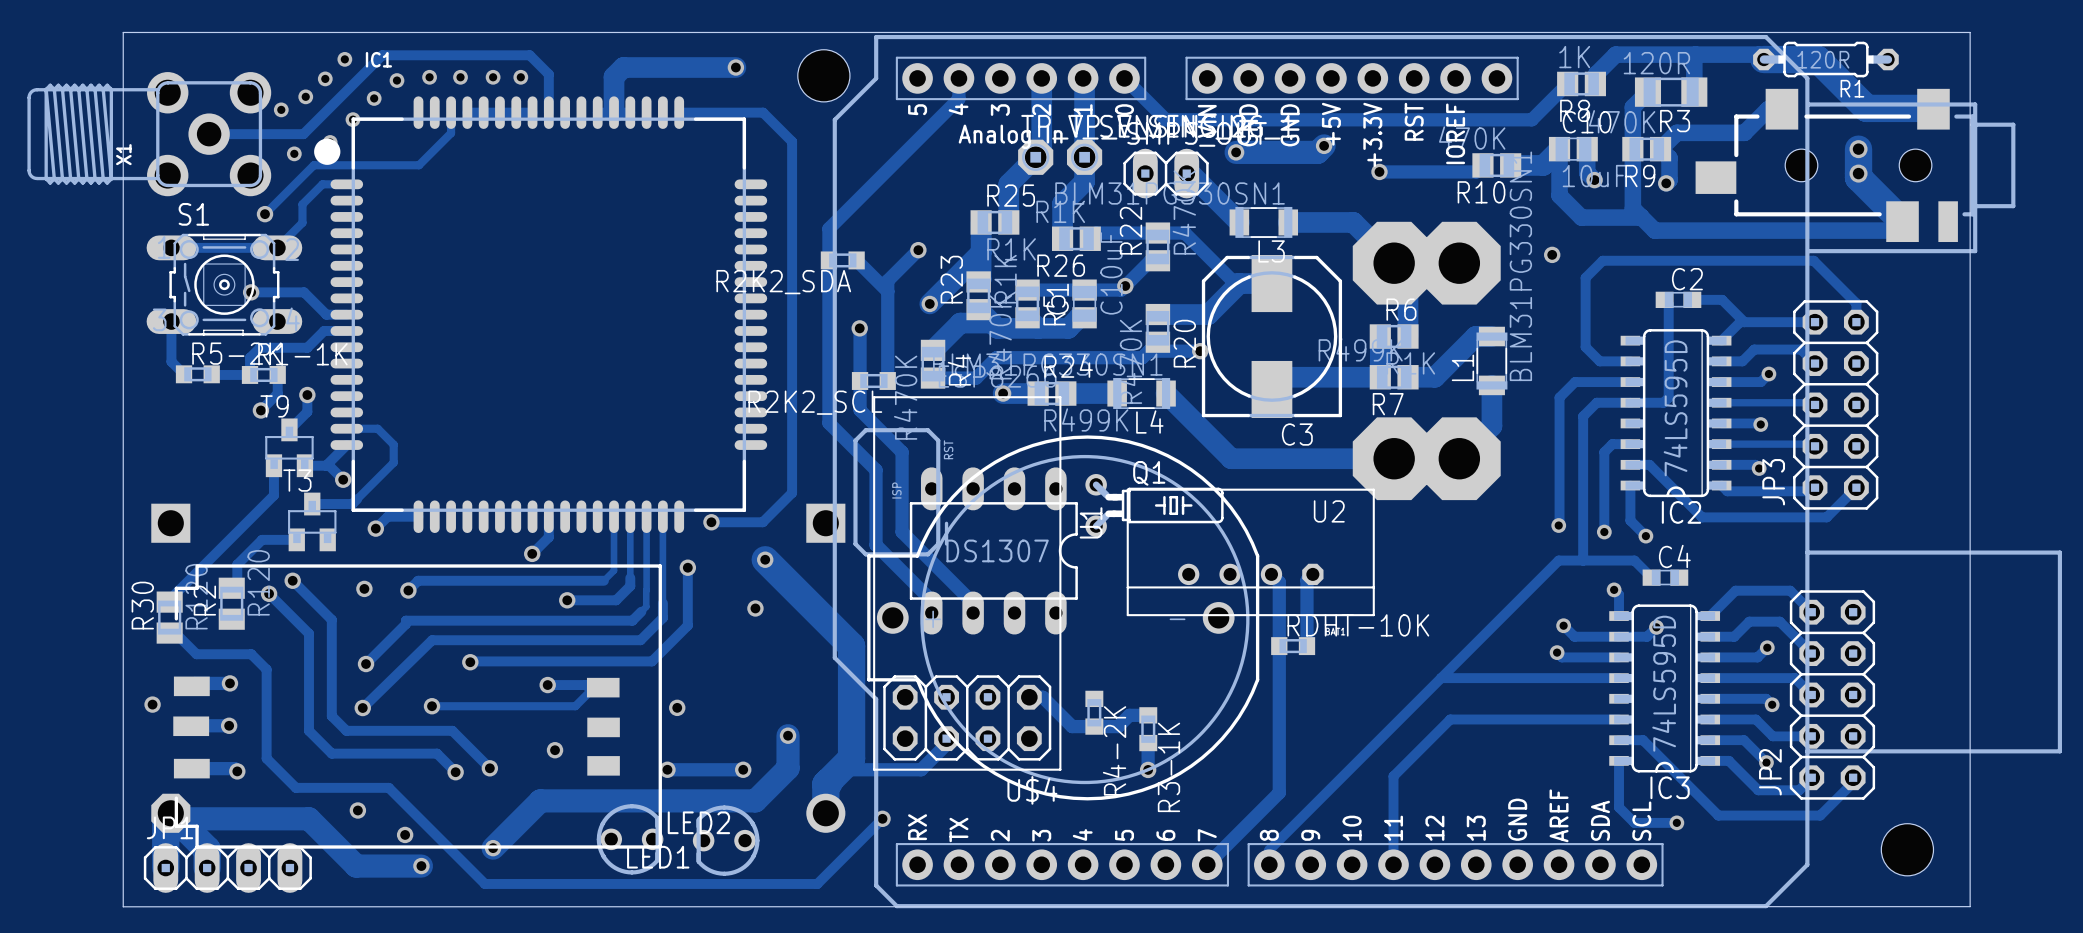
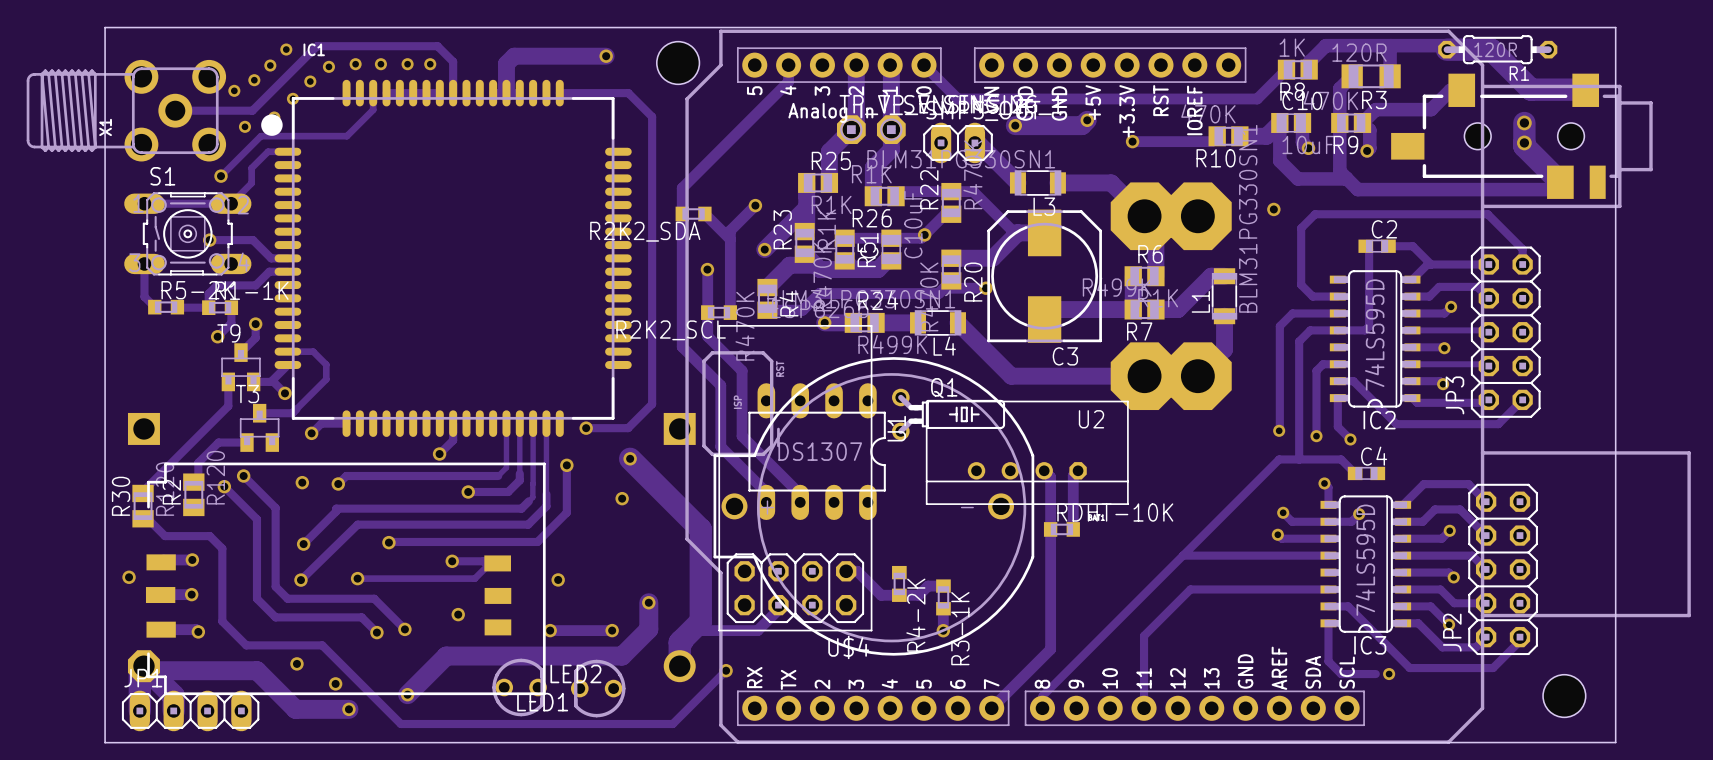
via position: (1676, 822) -> (1389, 674)

